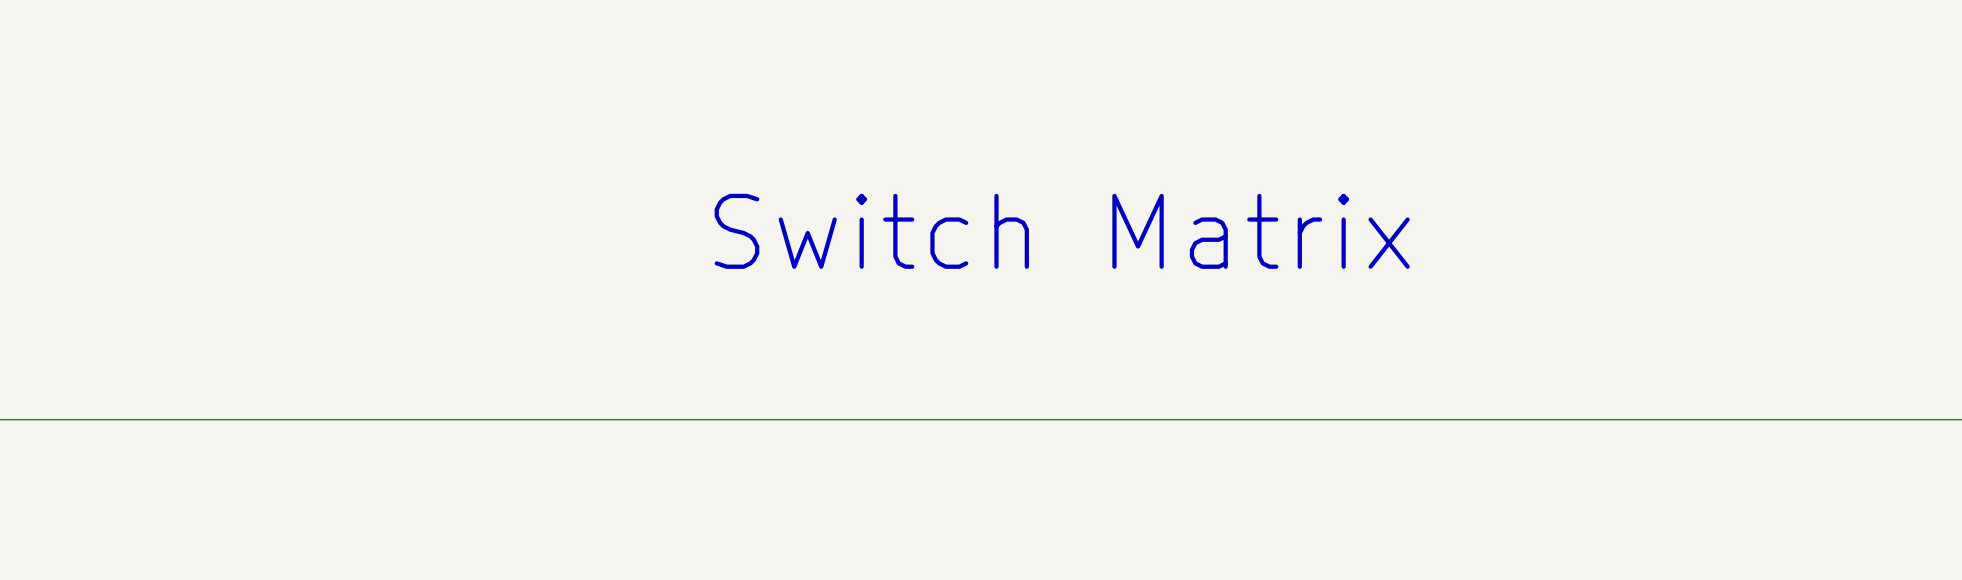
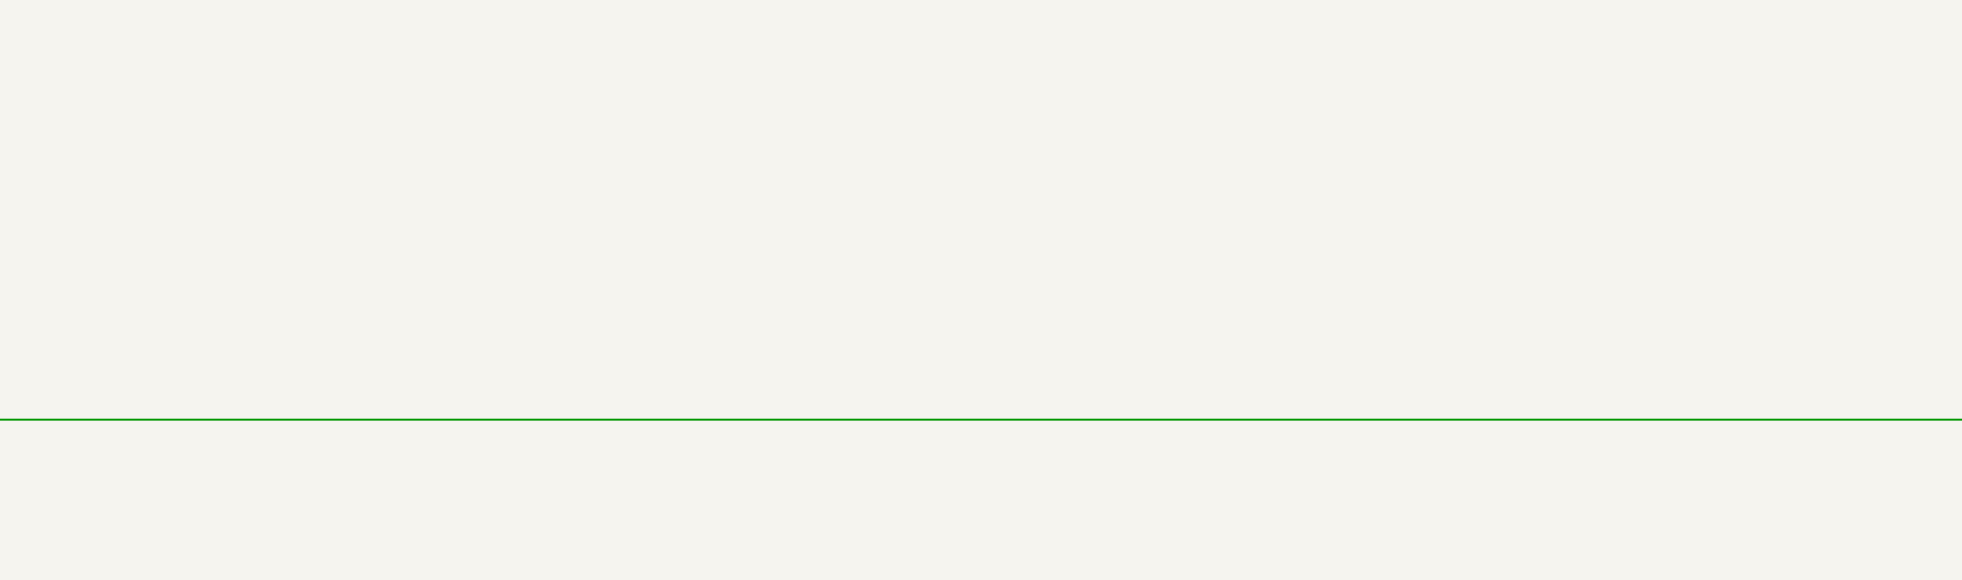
text: Switch Matrix (1062, 231) -> none

